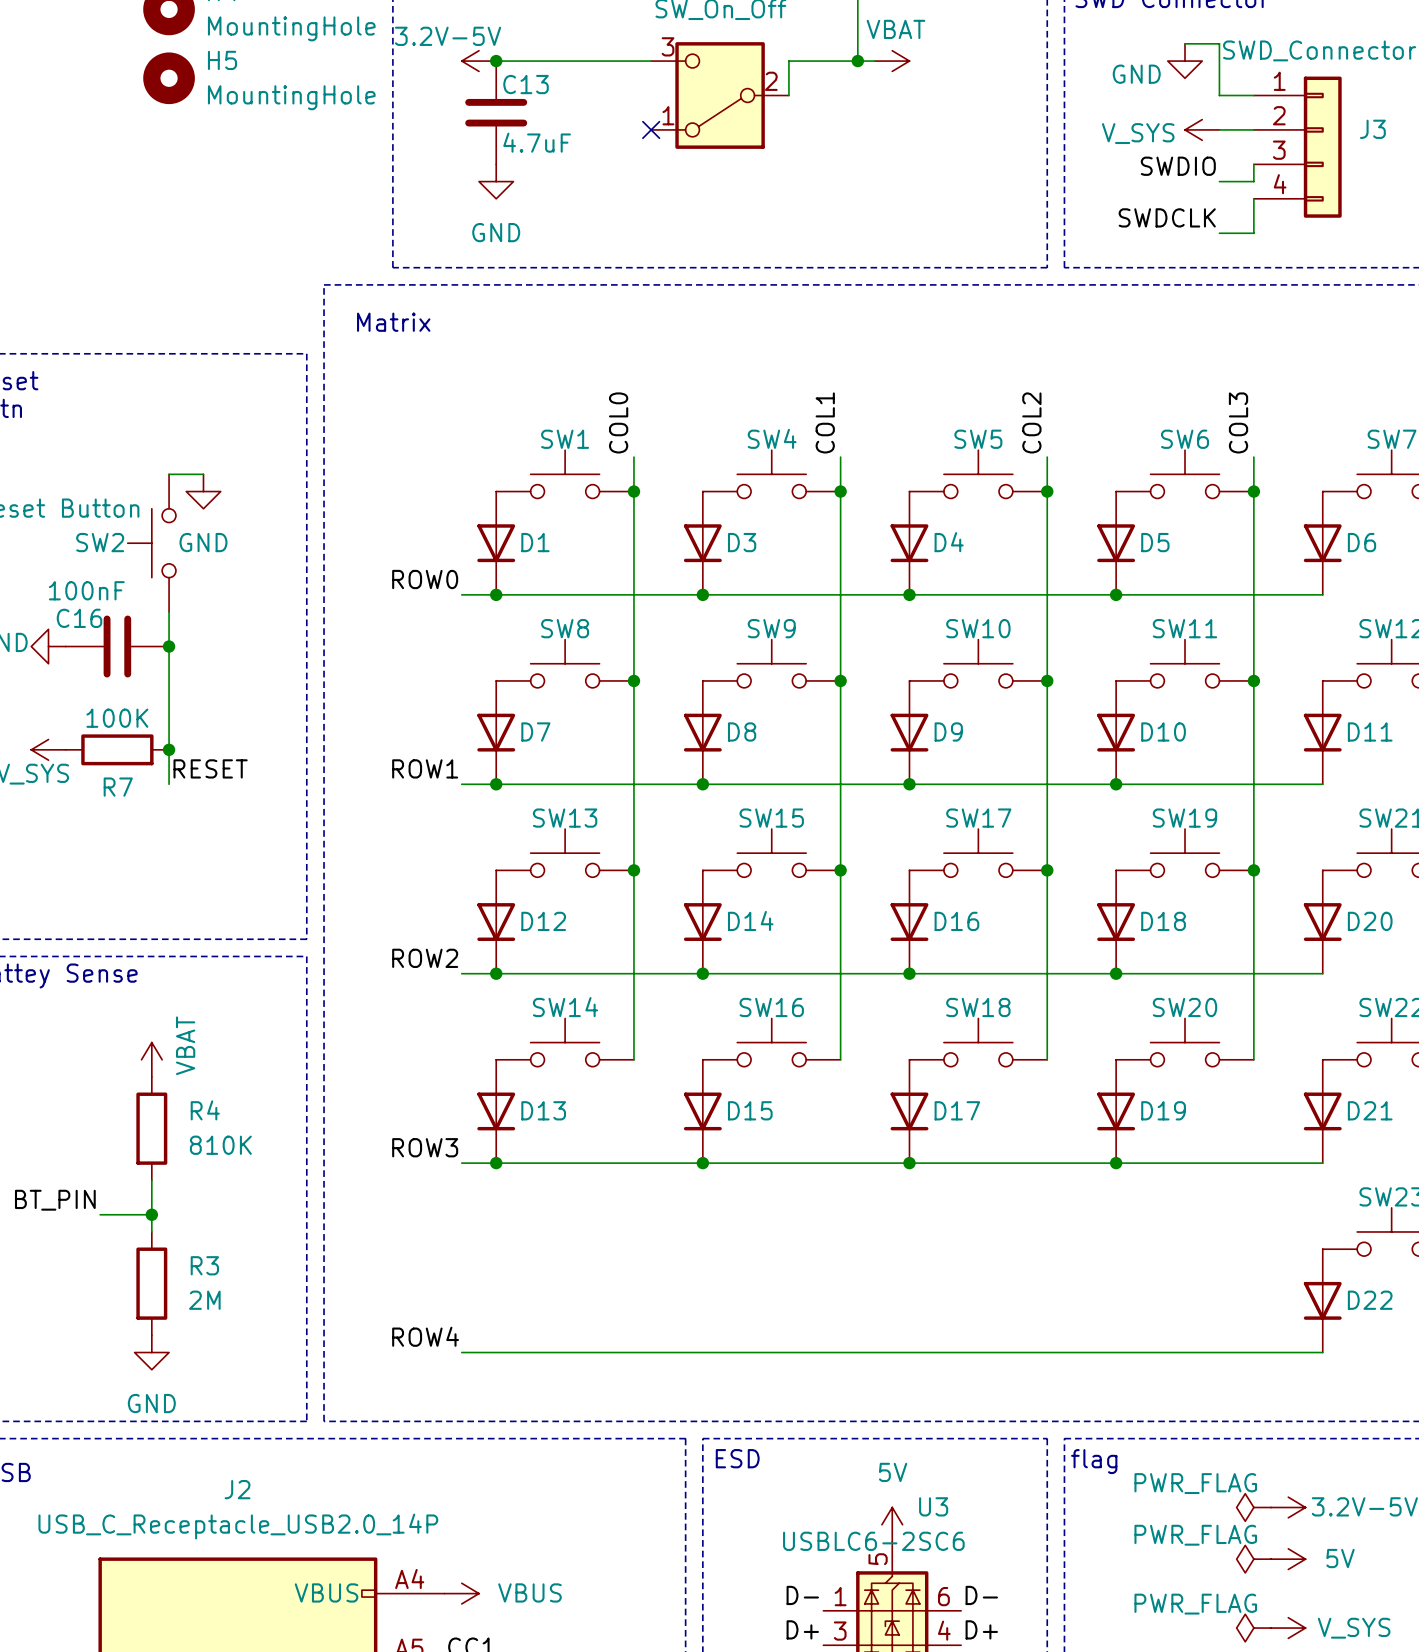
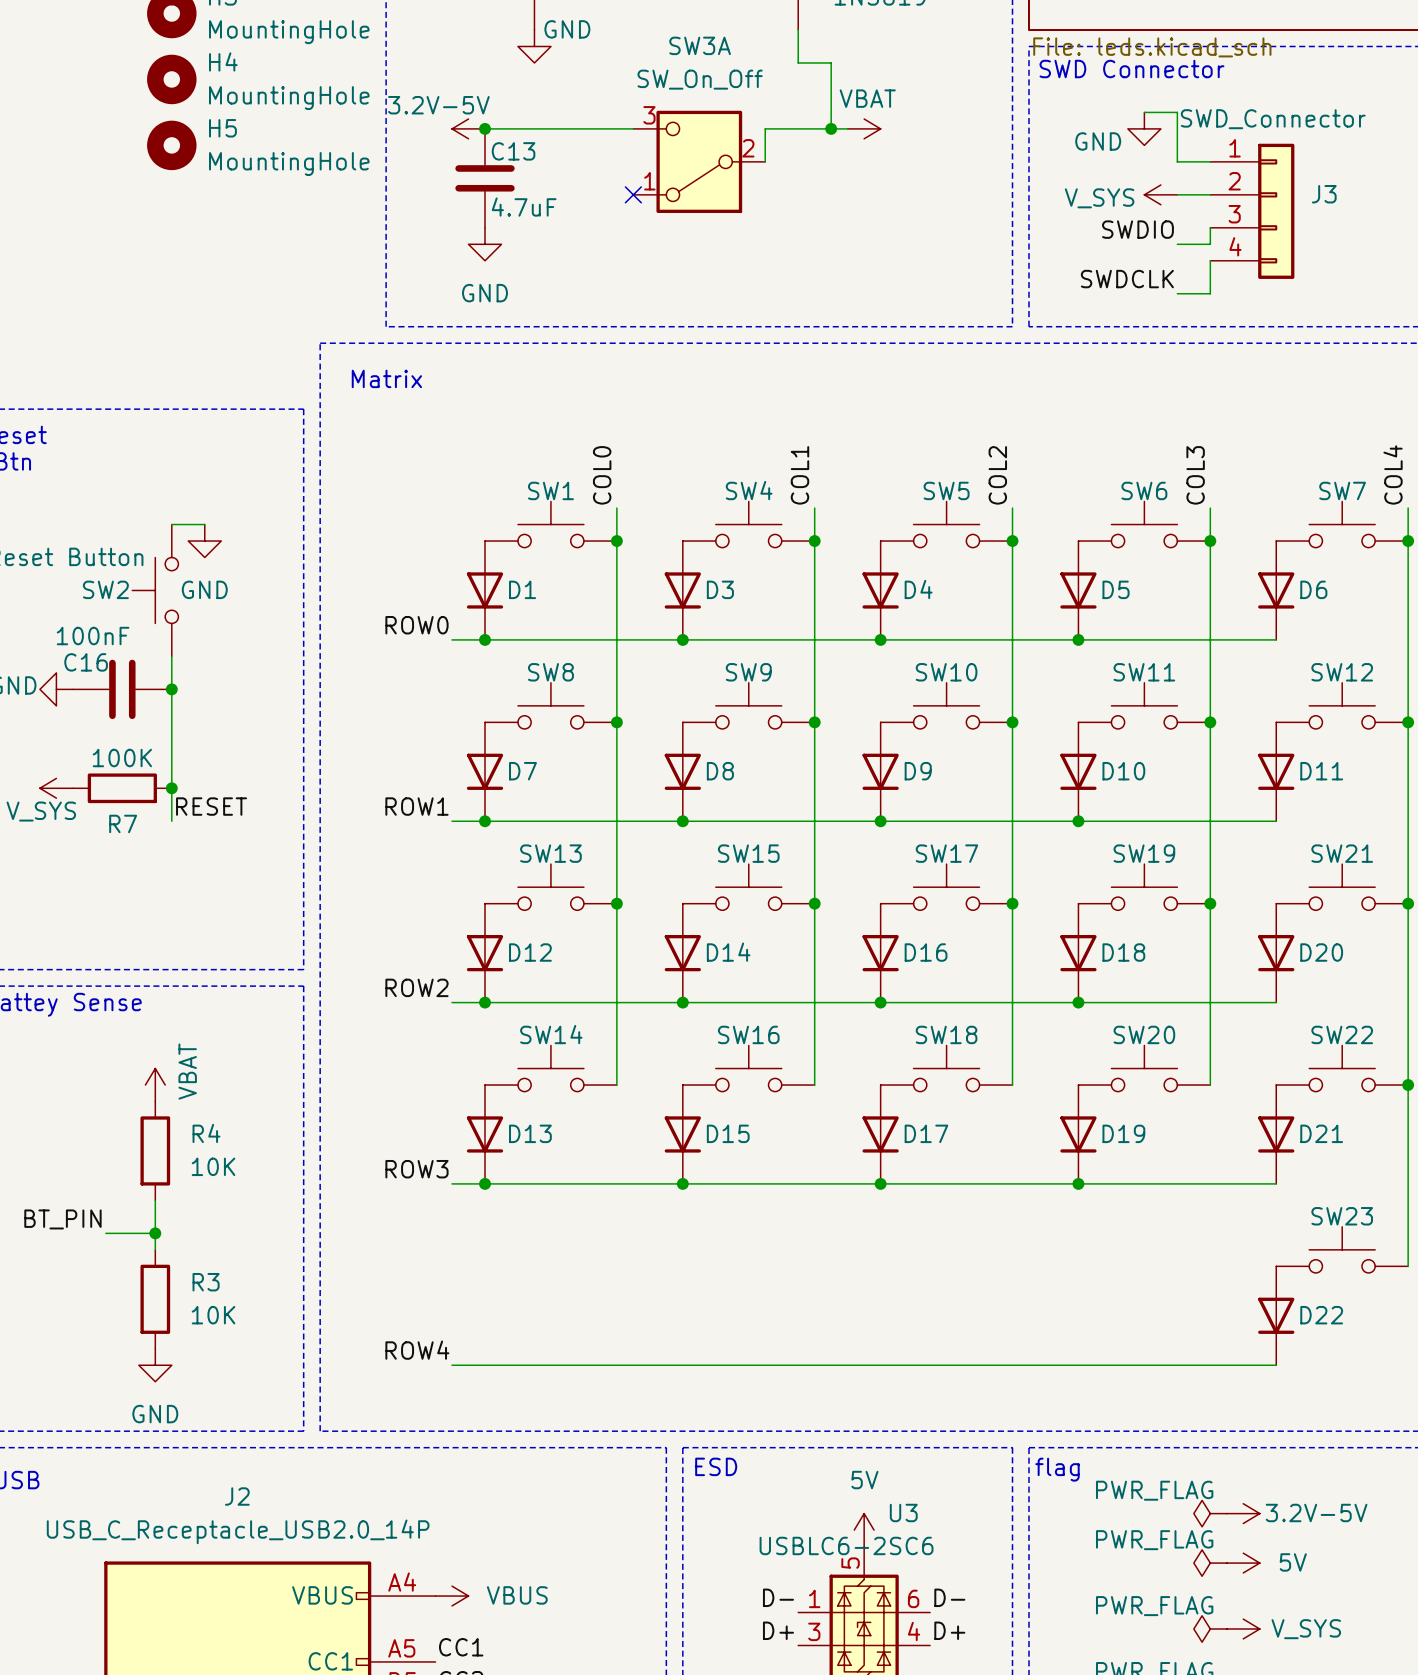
R4 value: 810K (220, 1145) -> 10K (213, 1166)
R3 value: 2M (204, 1300) -> 10K (213, 1315)

